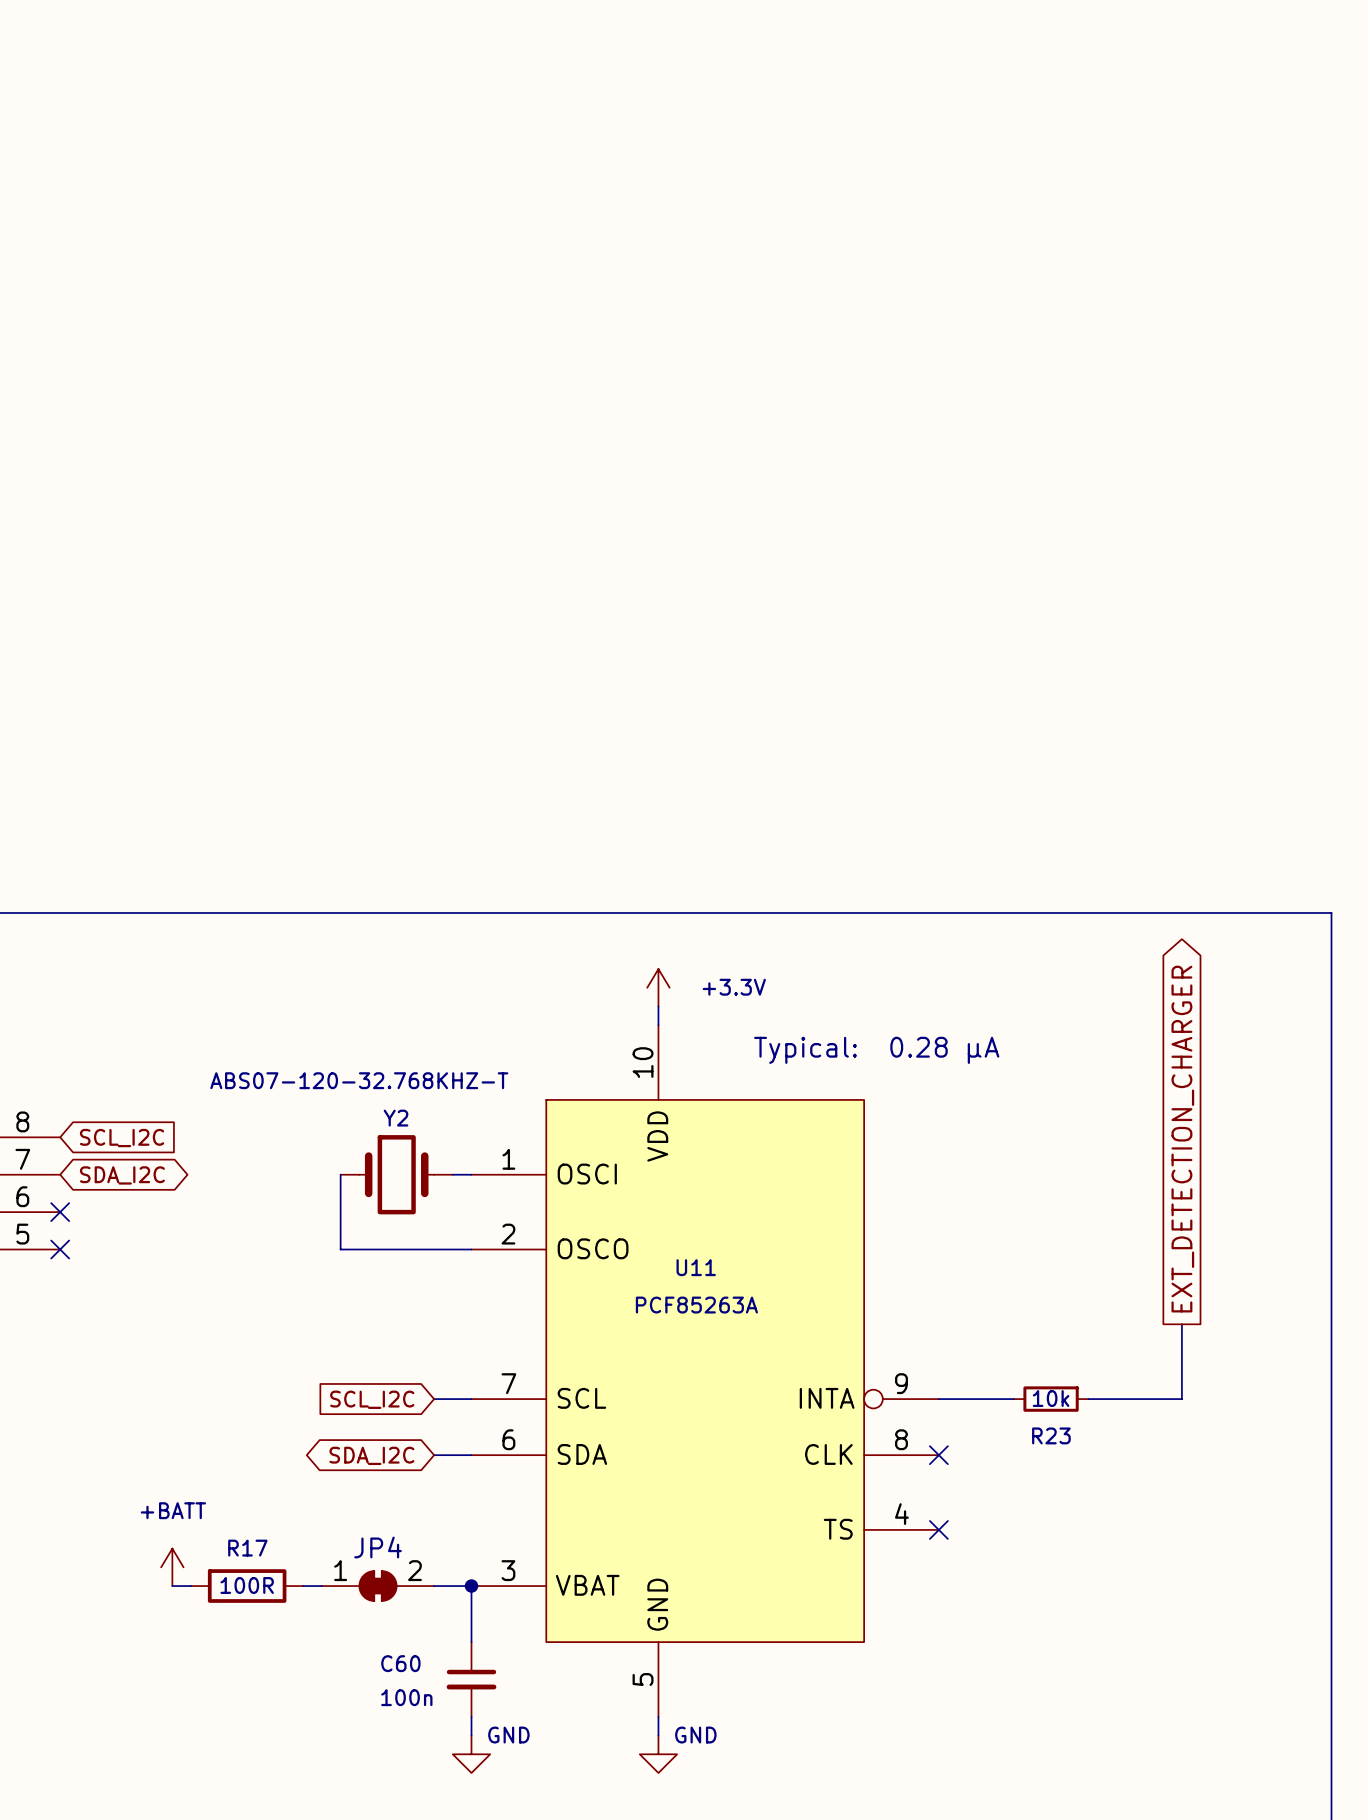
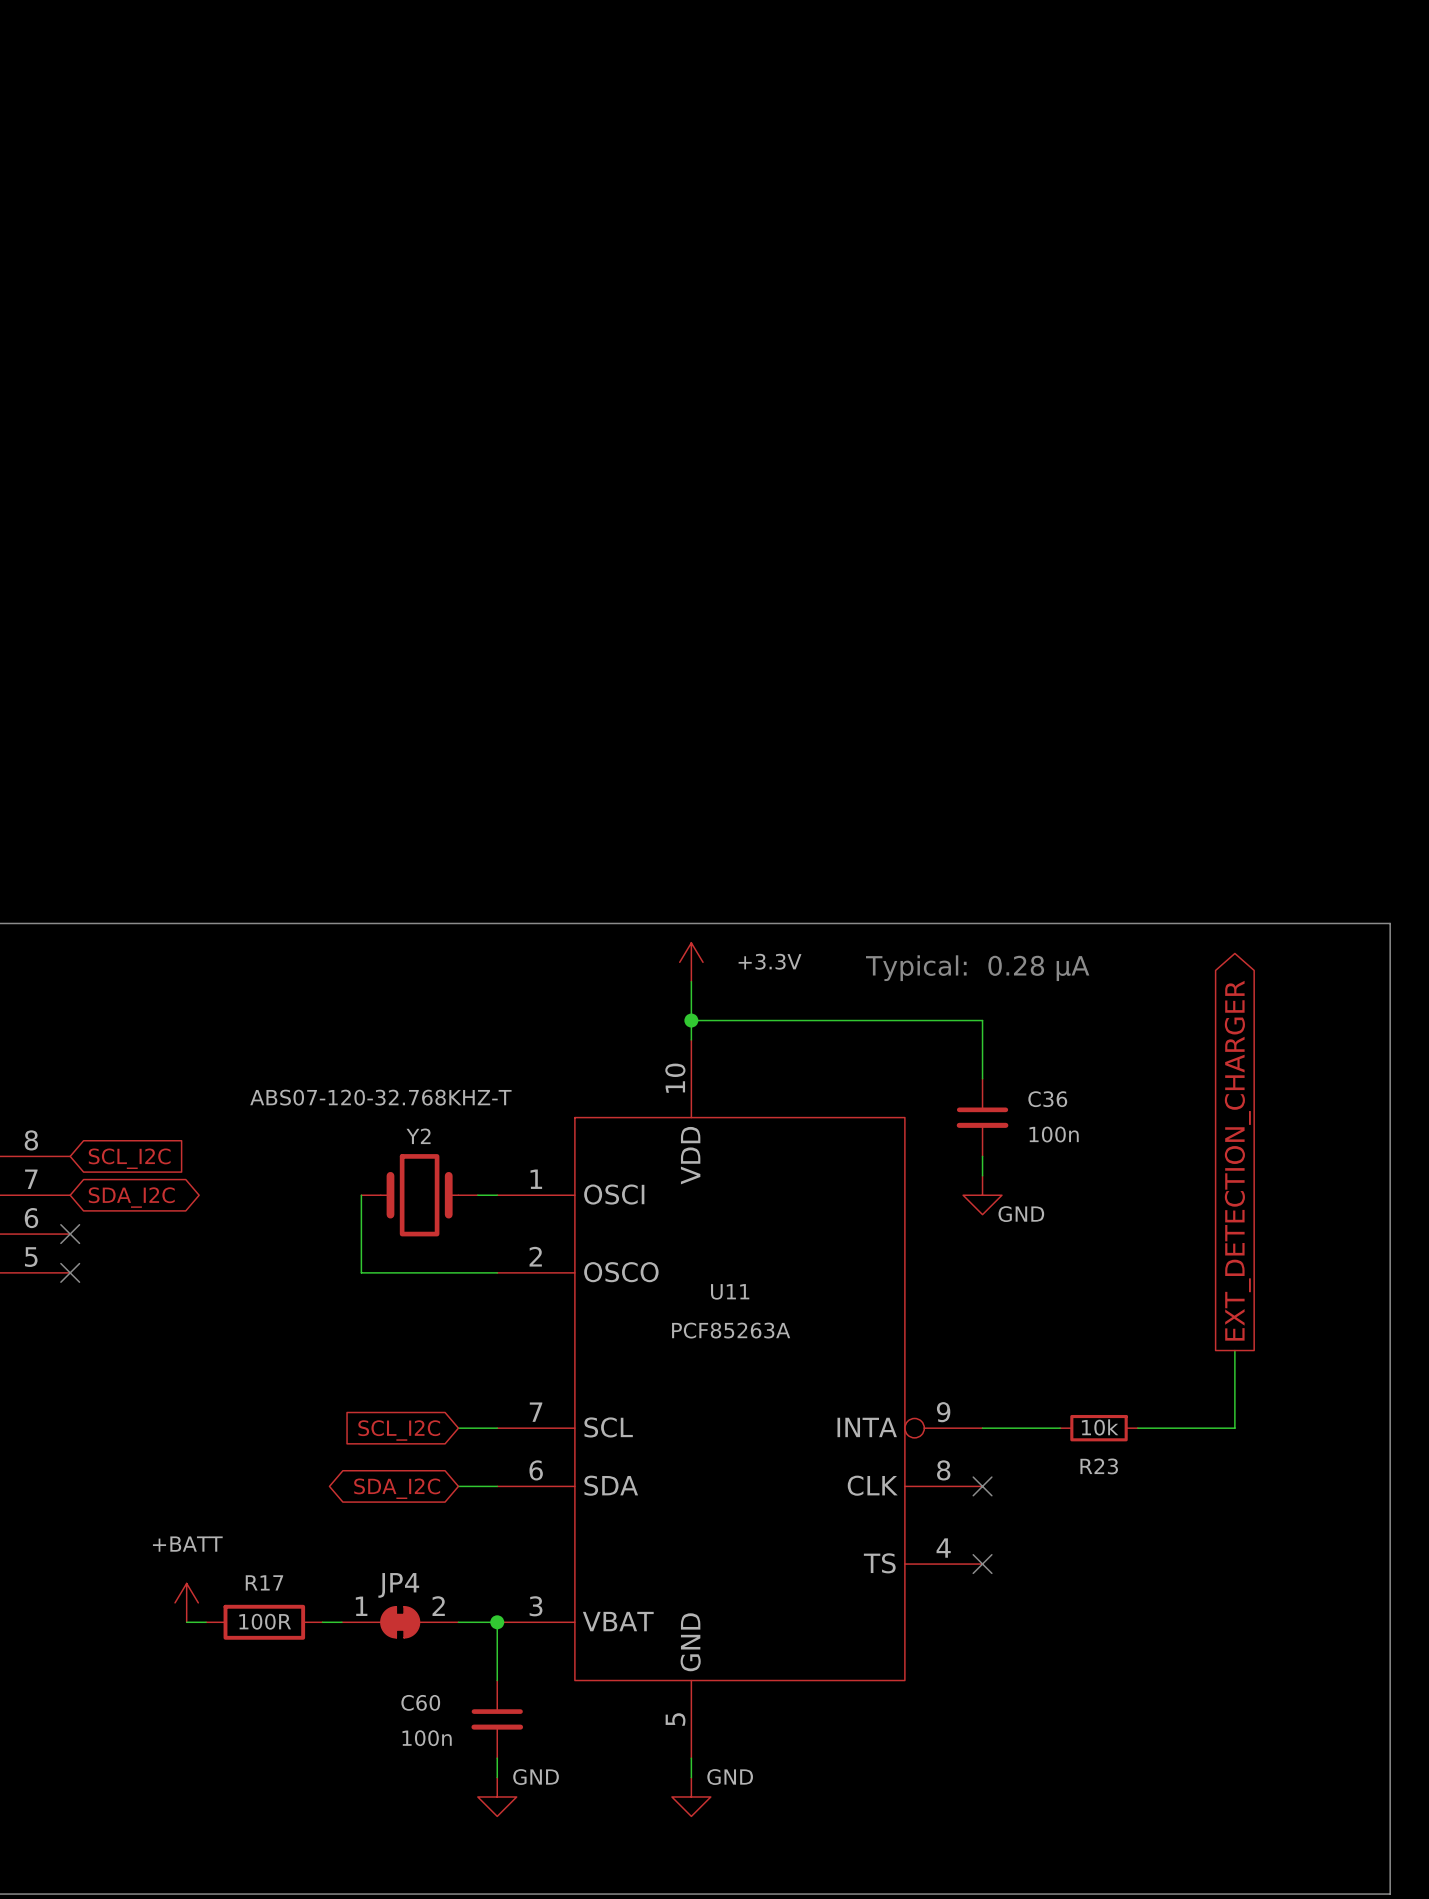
wire: none -> (691, 981) (691, 1020) (982, 1020) (982, 1078)
power symbol position: +3.3V (658, 987) -> +3.3V (691, 962)
junction: none -> (691, 1020)
text position: Typical: 0.28 μA (876, 1050) -> Typical: 0.28 μA (977, 968)
C36: none -> 100n (982, 1117)
wire: none -> (982, 1156) (982, 1175)
power symbol: none -> GND (982, 1195)

